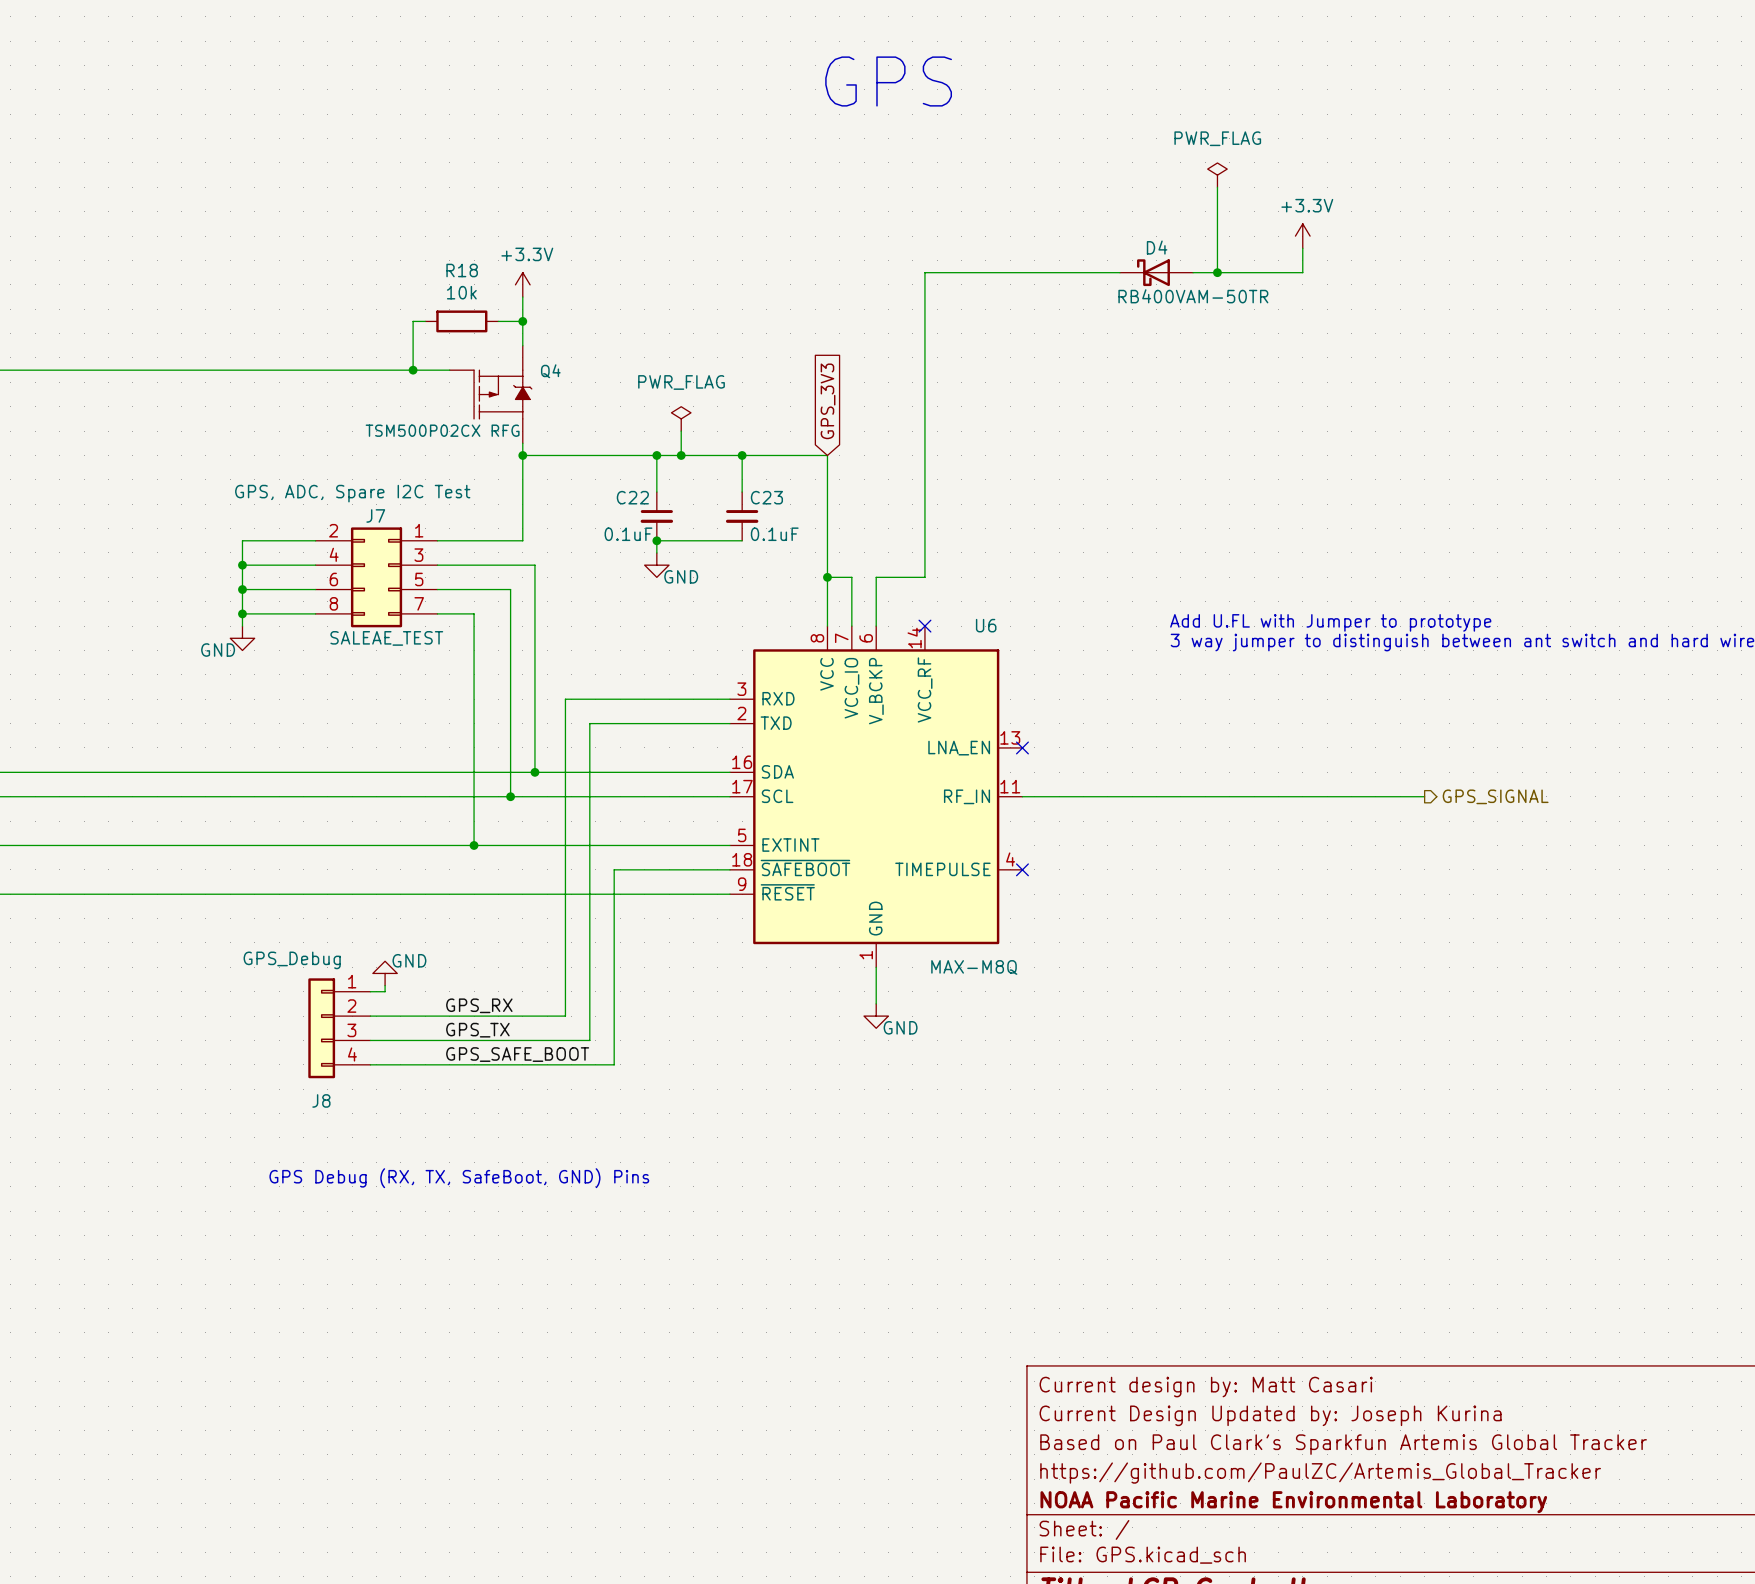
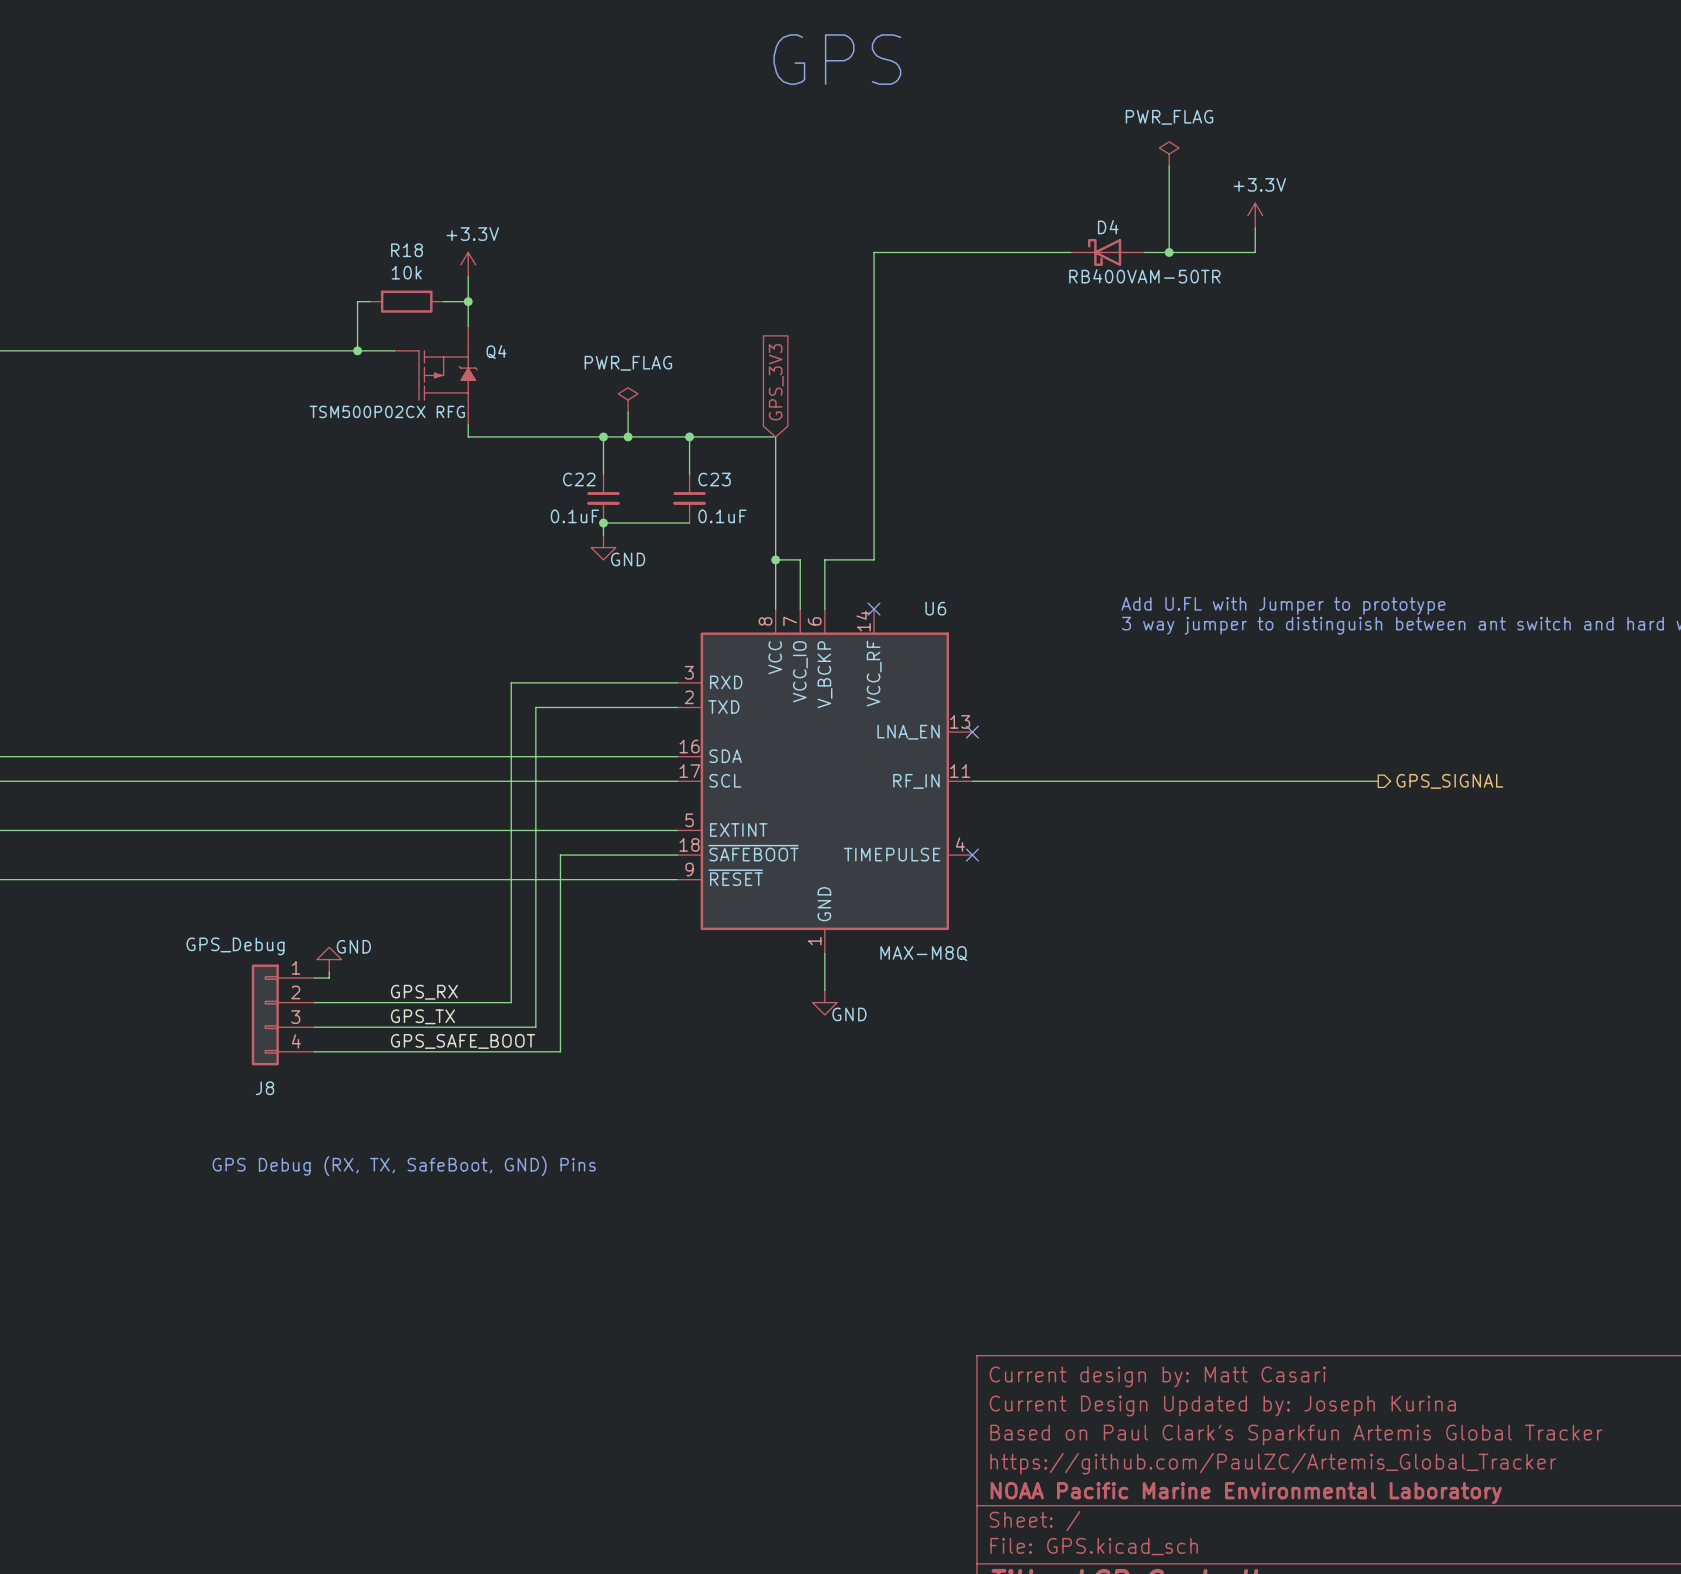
wire: (522, 455) (522, 540) (437, 540) -> none
junction: (522, 455) -> none
wire: (315, 540) (242, 540) (242, 626) -> none
wire: (242, 565) (315, 565) -> none
junction: (242, 565) -> none
wire: (437, 565) (534, 565) (534, 772) -> none
J7: SALEAE_TEST (376, 577) -> none
wire: (242, 589) (315, 589) -> none
junction: (242, 589) -> none
wire: (437, 589) (510, 589) (510, 796) -> none
wire: (242, 613) (315, 613) -> none
junction: (242, 613) -> none
wire: (437, 613) (474, 613) (474, 845) -> none
power symbol: GND (242, 638) -> none
junction: (534, 772) -> none
junction: (510, 796) -> none
junction: (474, 845) -> none

